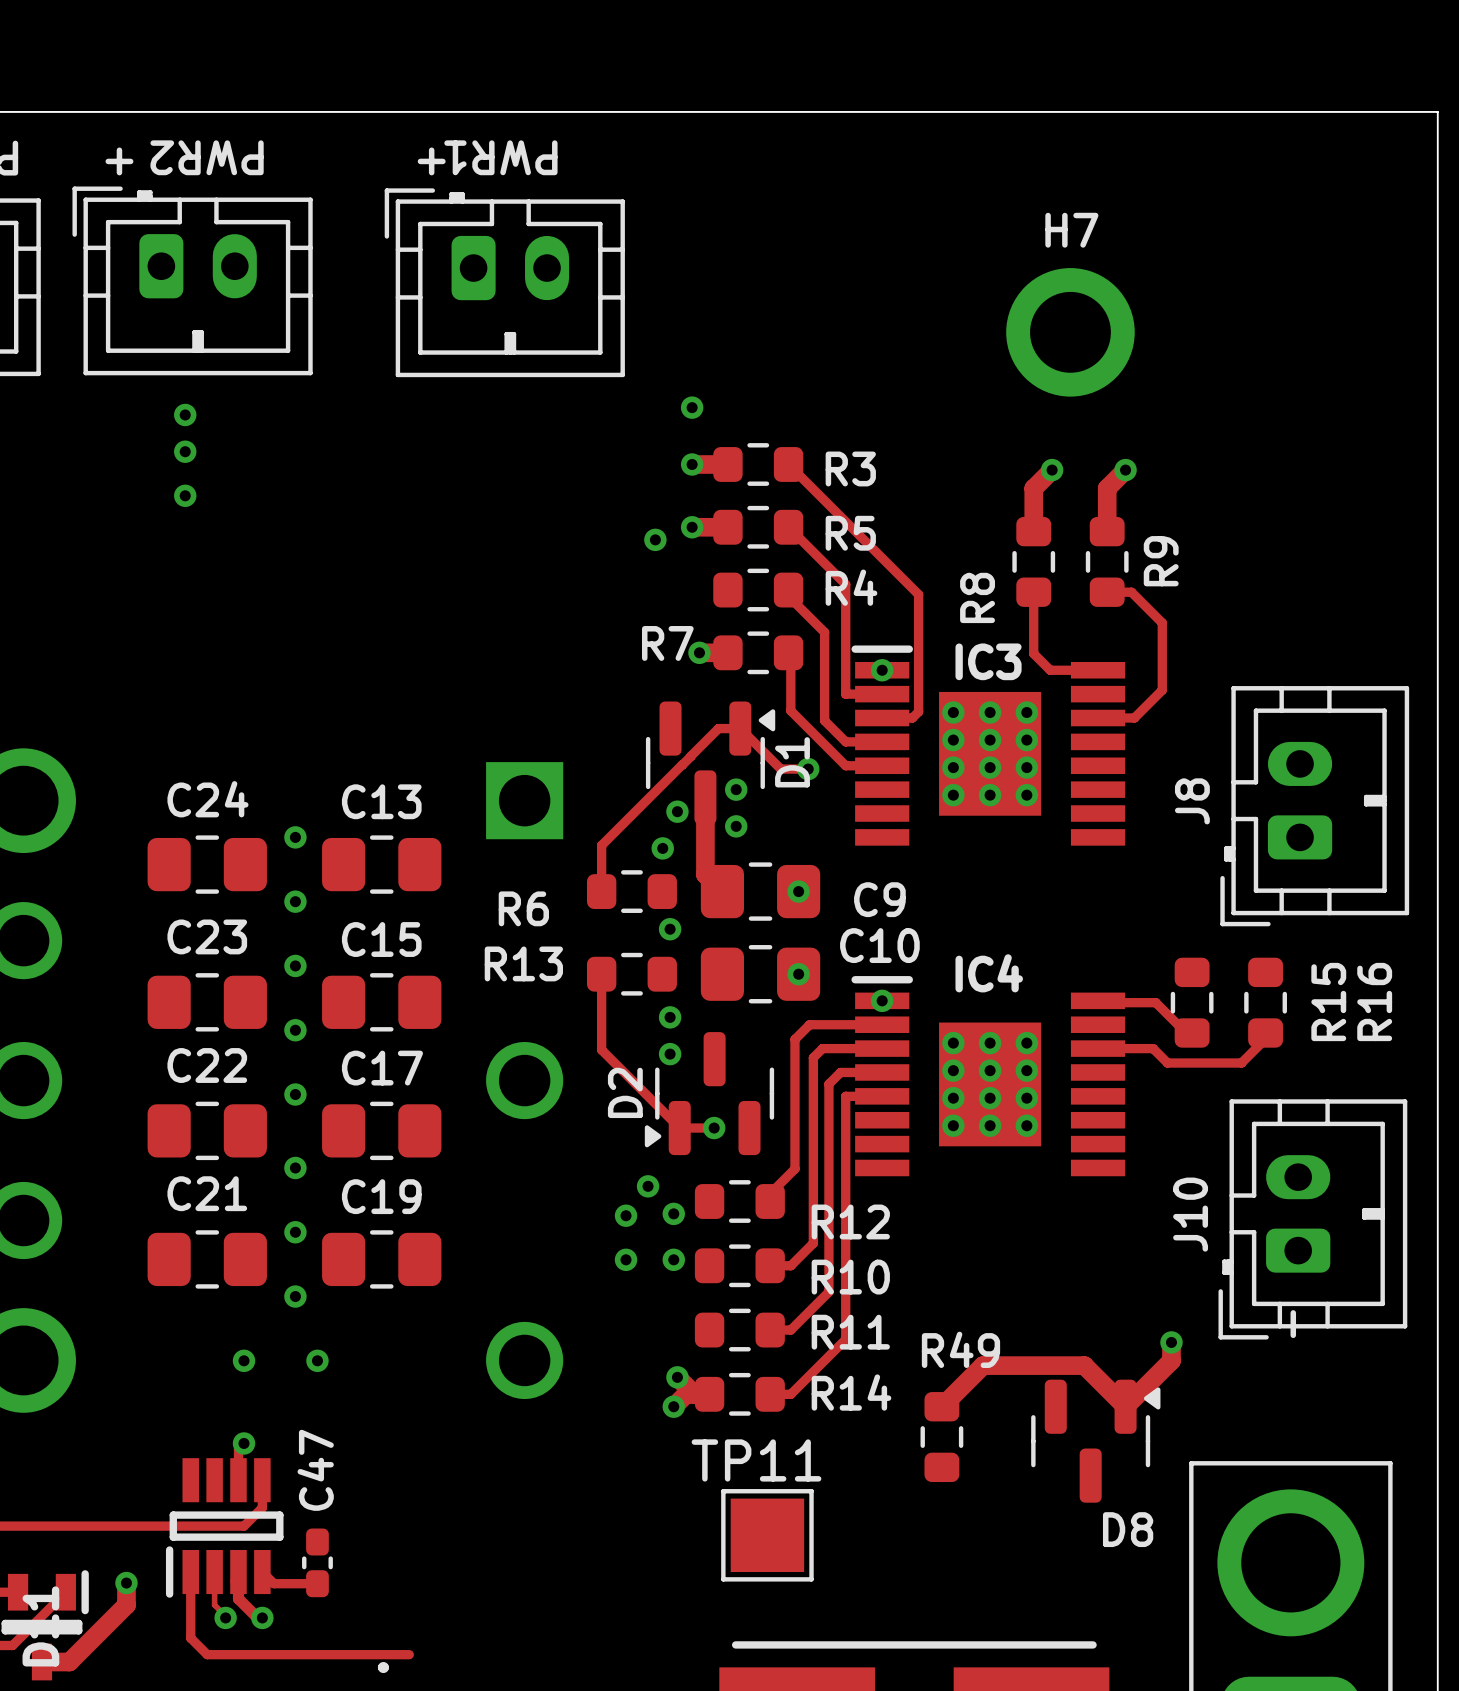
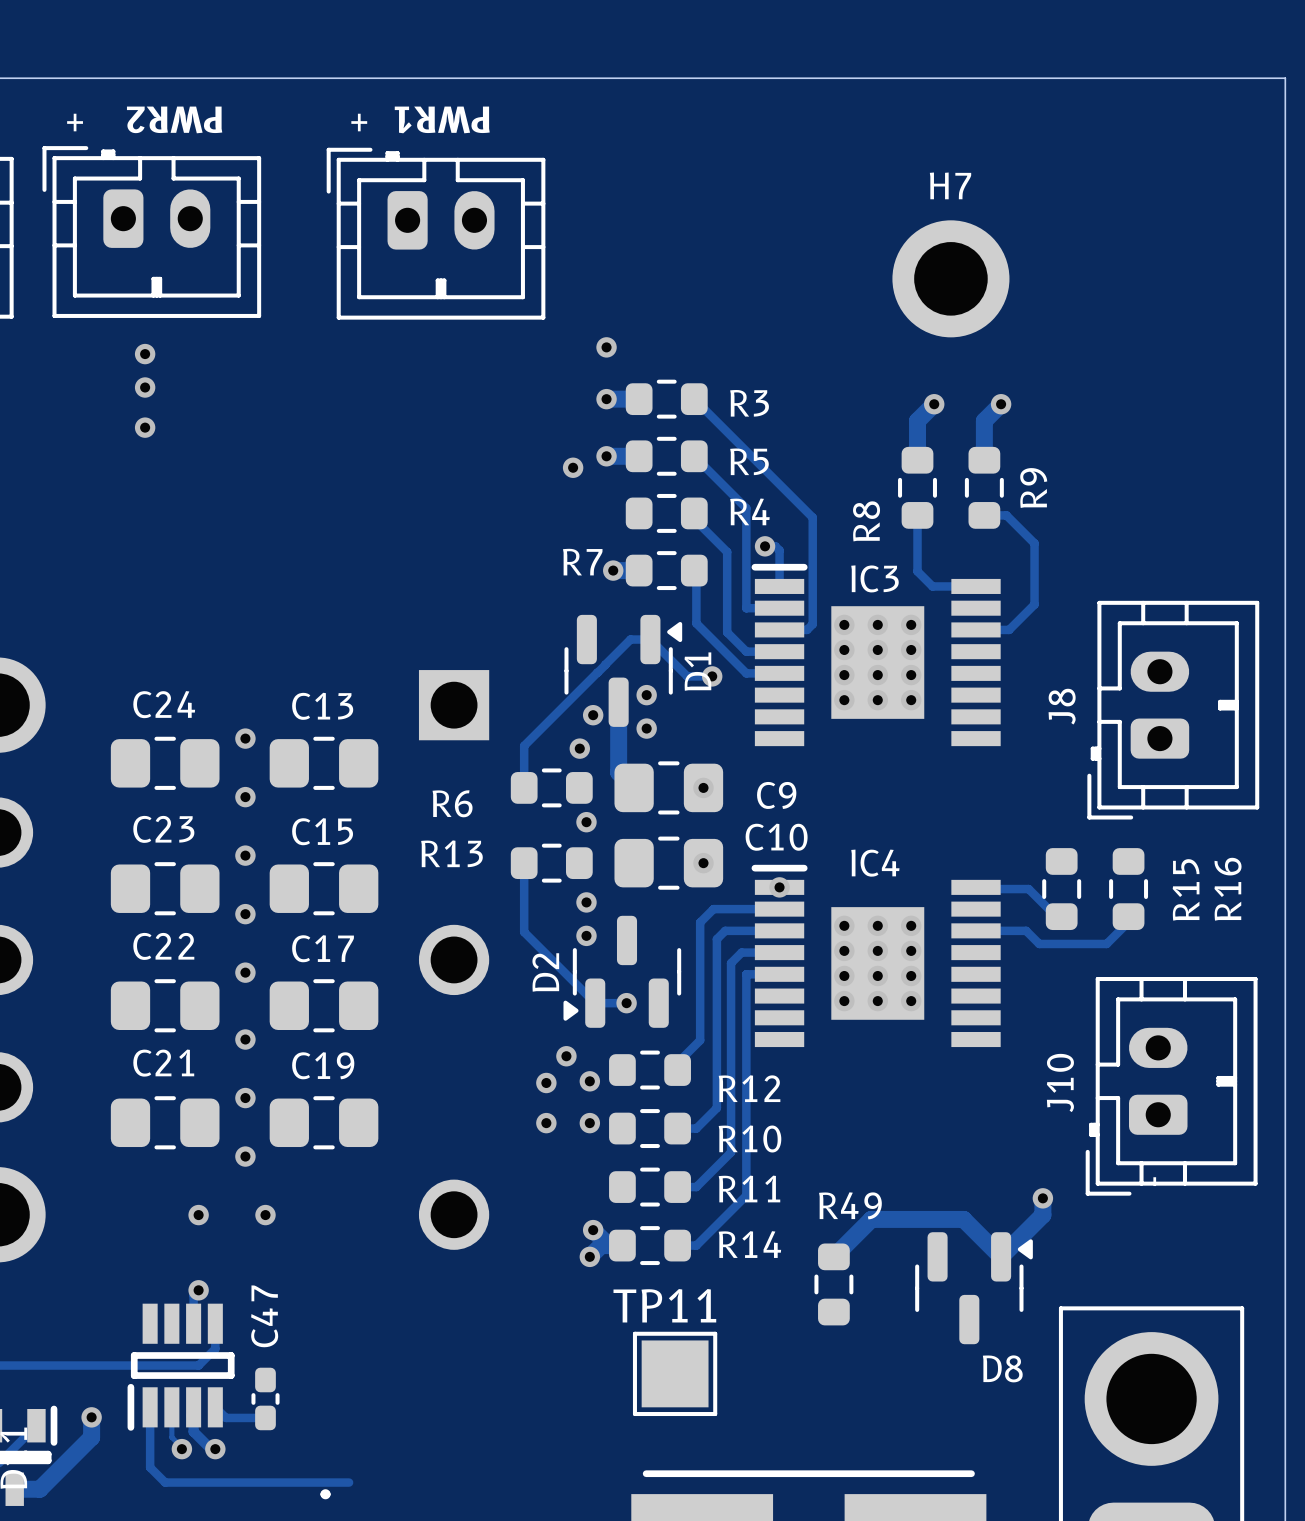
track: none -> (765, 546) (775, 546) (779, 550) (779, 586)
via position: (882, 670) -> (765, 546)

